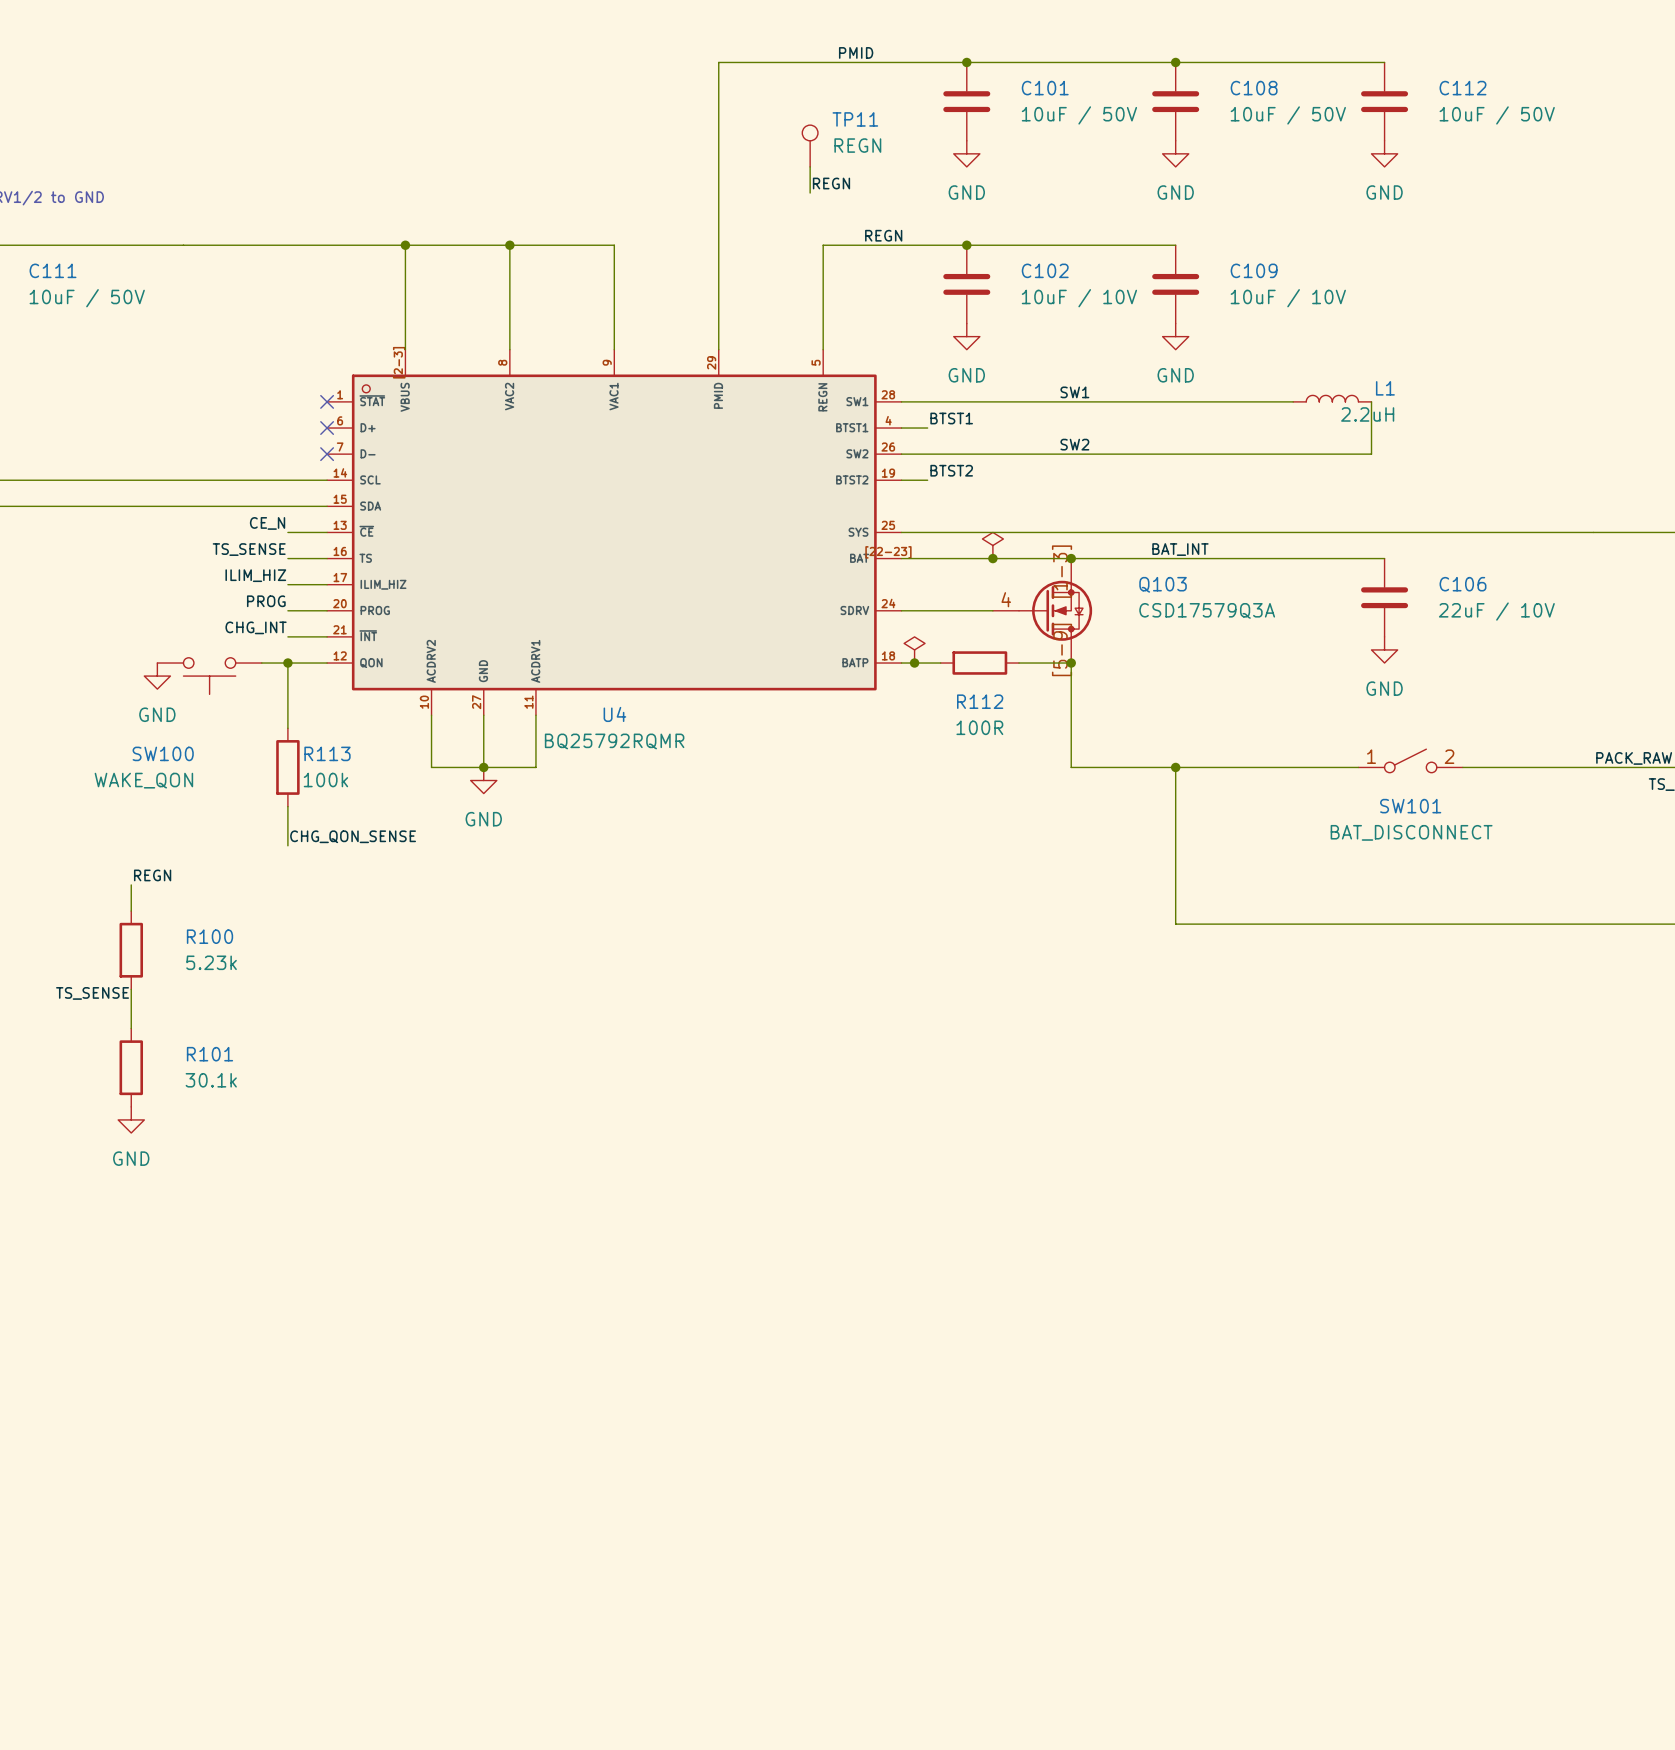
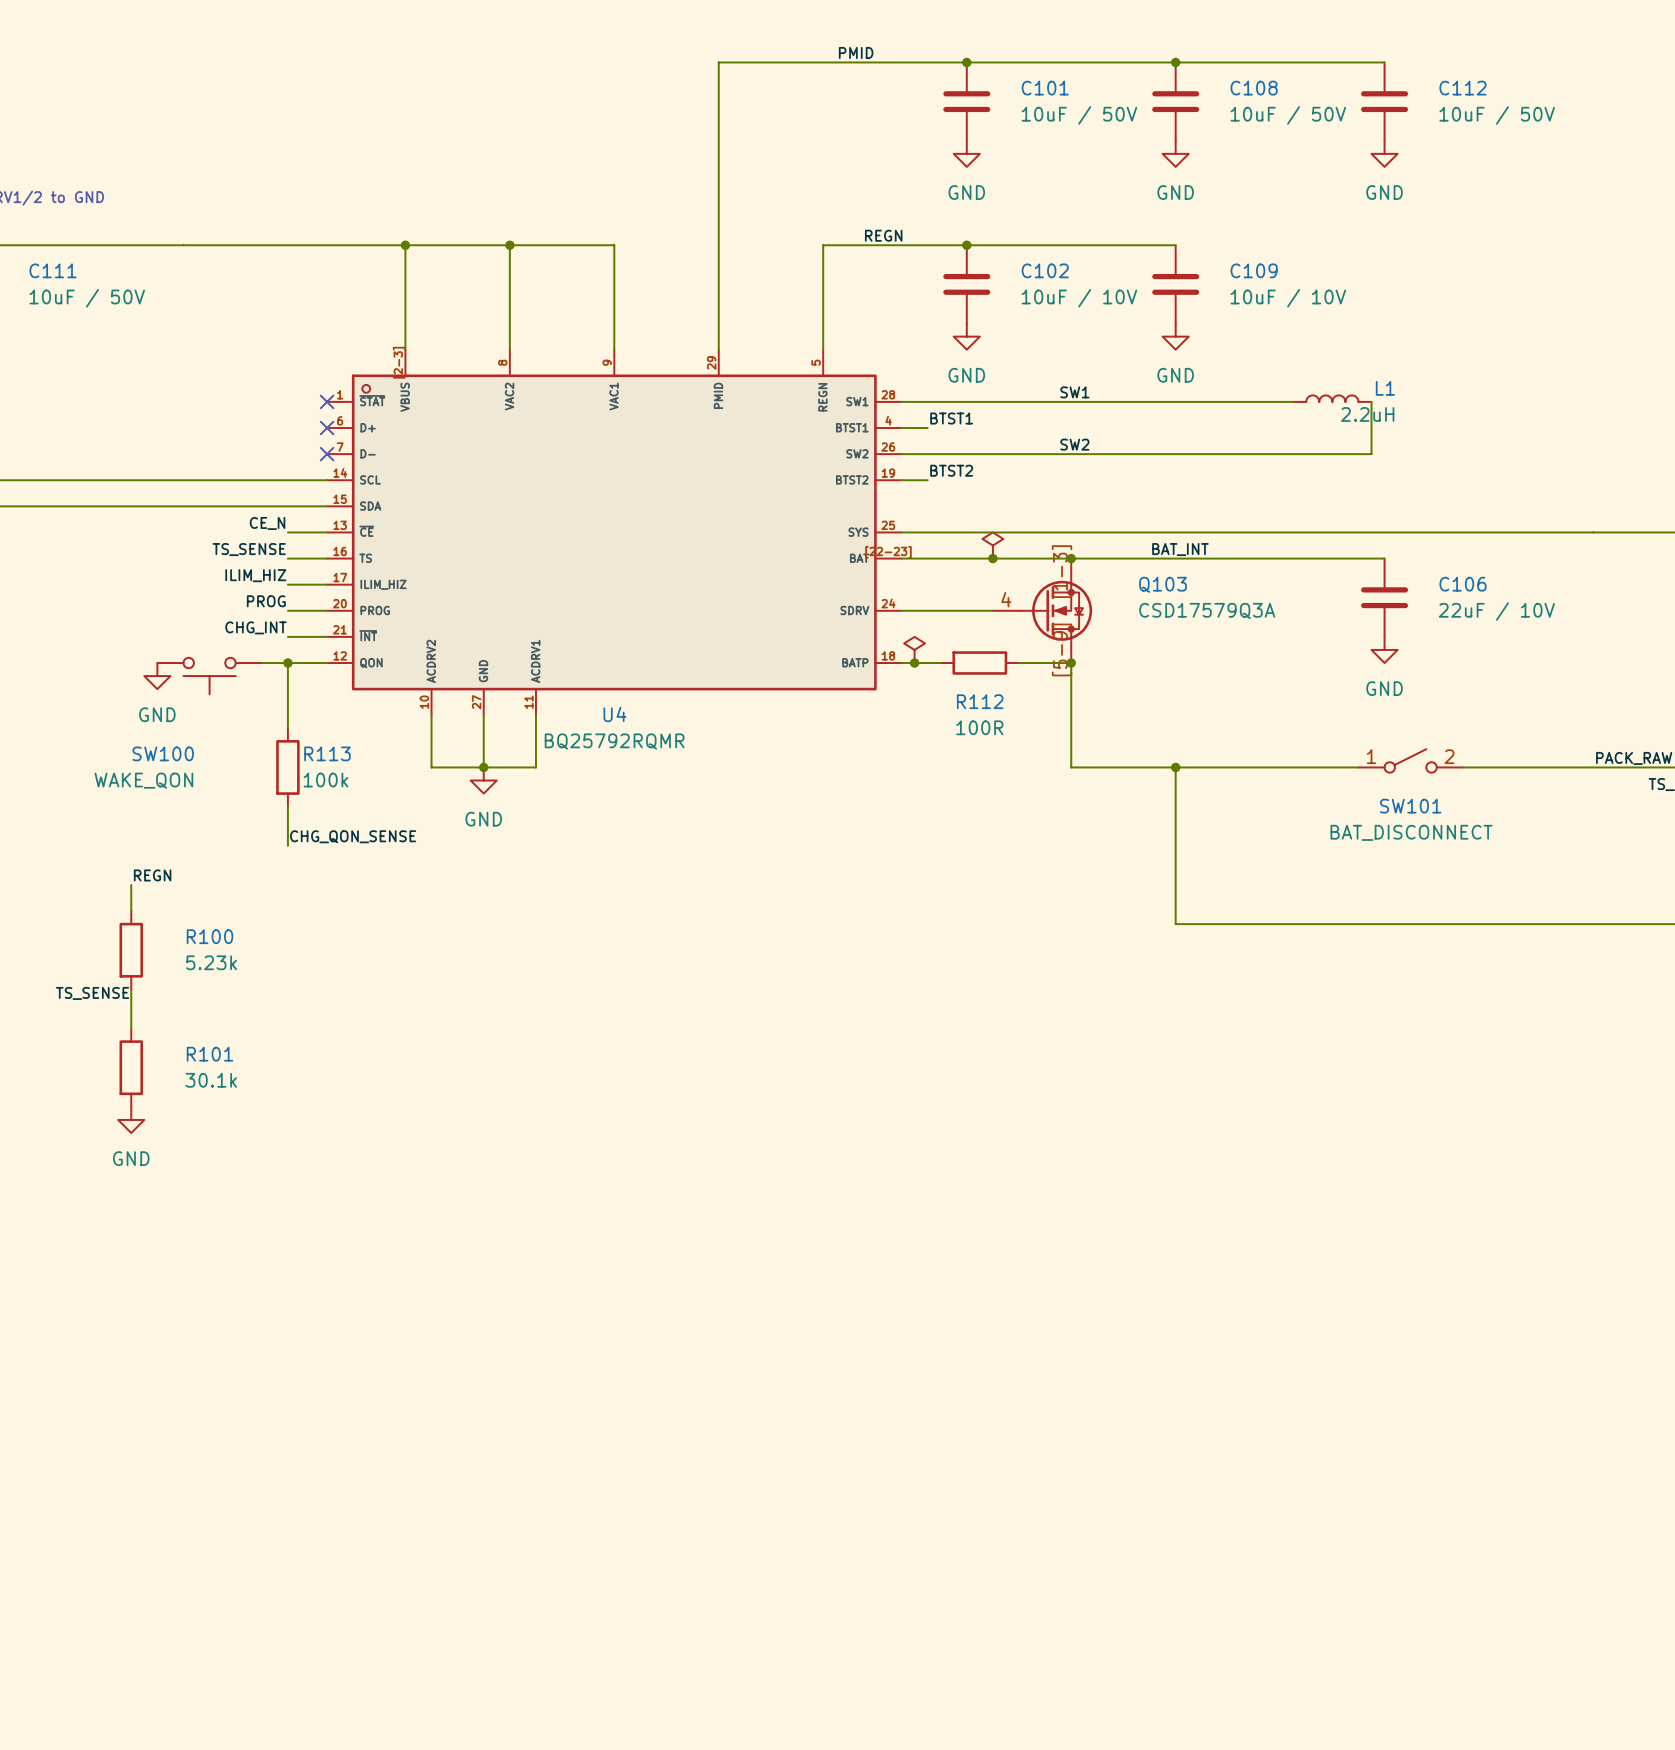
TP11: REGN (810, 146) -> none
wire: (810, 166) (810, 193) -> none
label: REGN (831, 183) -> none

